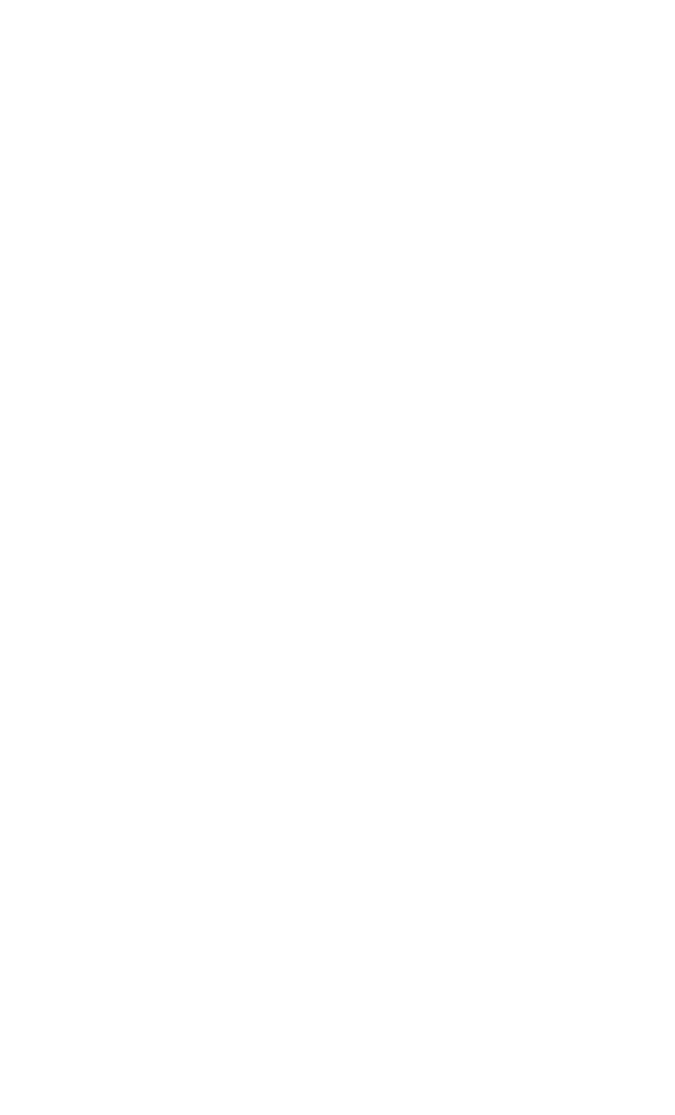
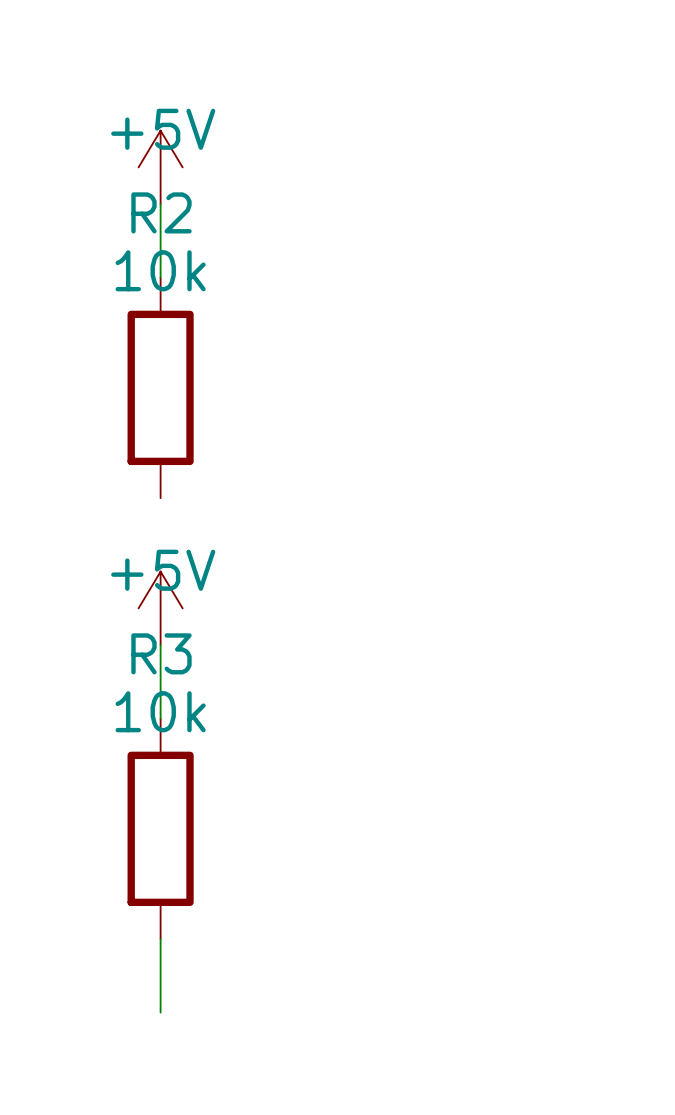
power symbol: none -> +5V (160, 167)
wire: none -> (160, 204) (160, 277)
R2: none -> 10k (160, 387)
power symbol: none -> +5V (160, 608)
wire: none -> (160, 645) (160, 718)
R3: none -> 10k (160, 828)
wire: none -> (160, 939) (160, 1012)

